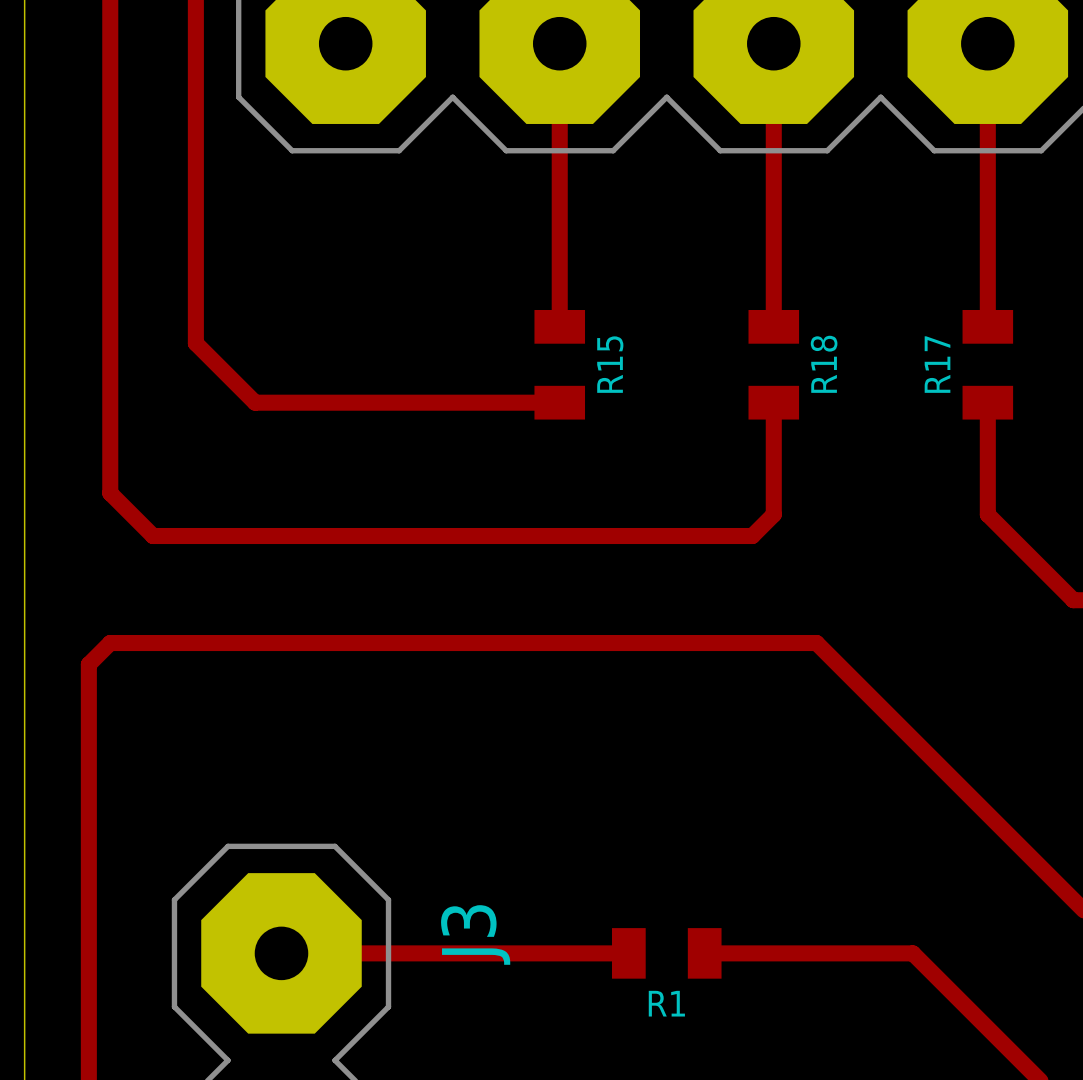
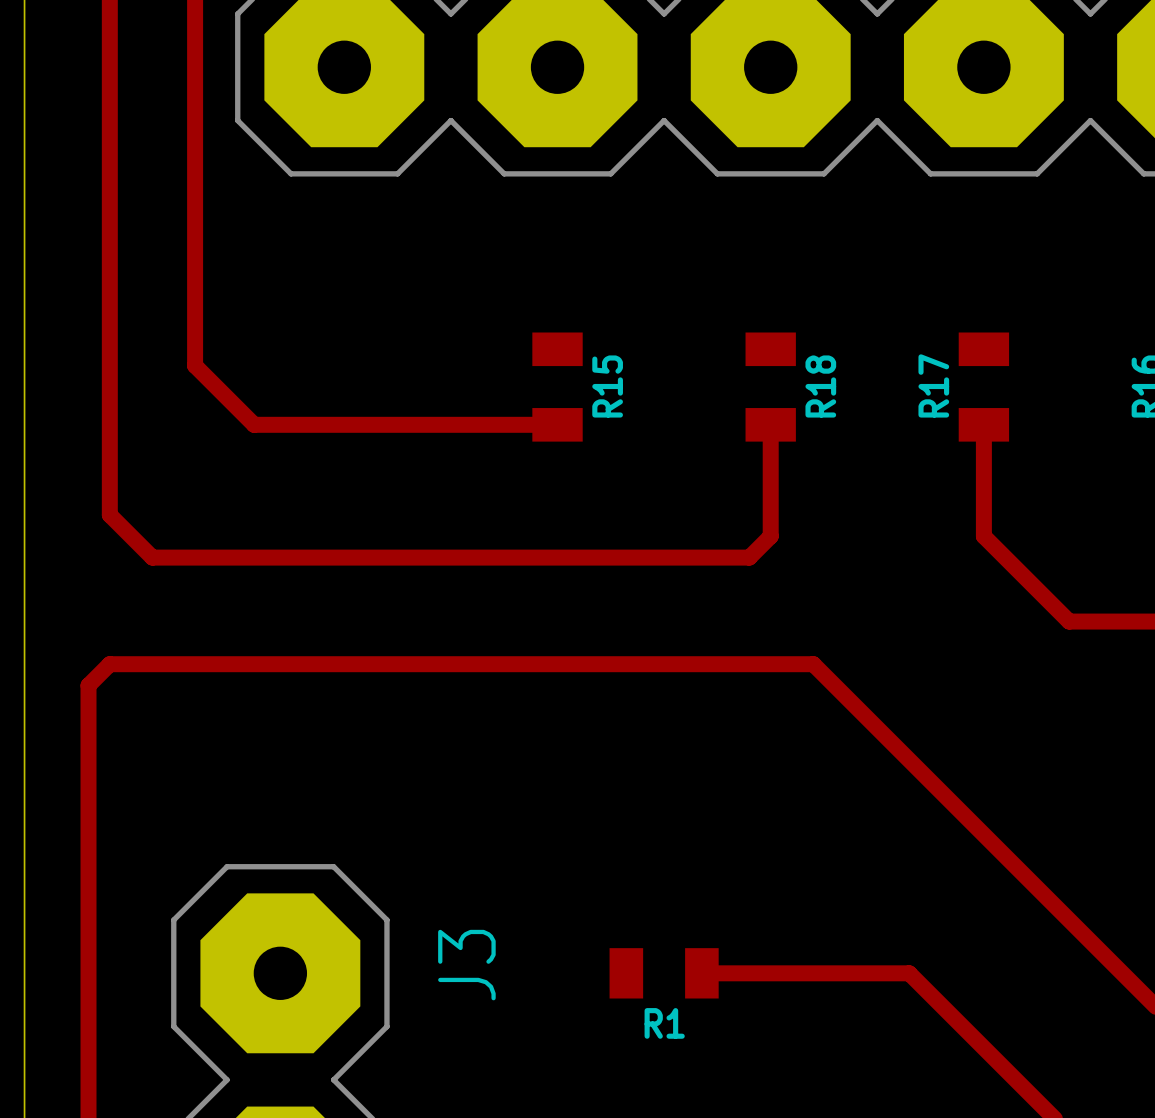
top track: (559, 43) (559, 326) -> none
top track: (773, 43) (773, 326) -> none
top track: (987, 43) (987, 326) -> none
top track: (281, 953) (628, 953) -> none

